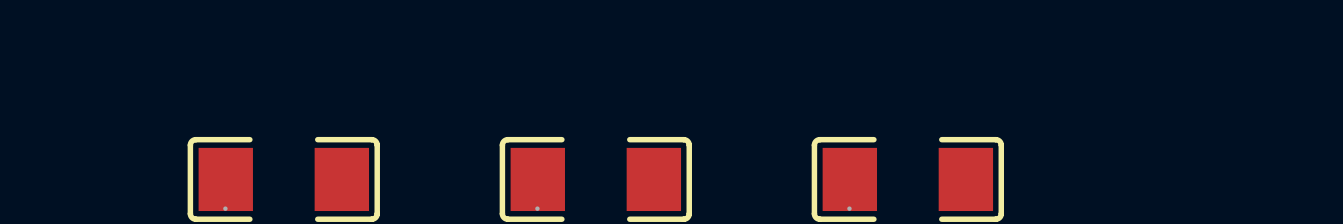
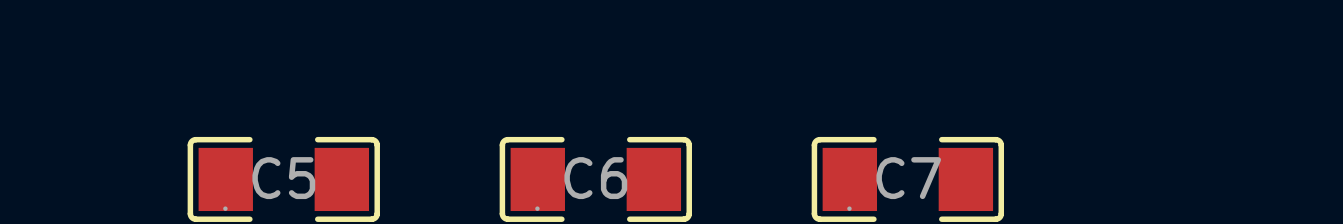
C5 name: none -> C5 (283, 178)
C6 name: none -> C6 (595, 178)
C7 name: none -> C7 (908, 178)

